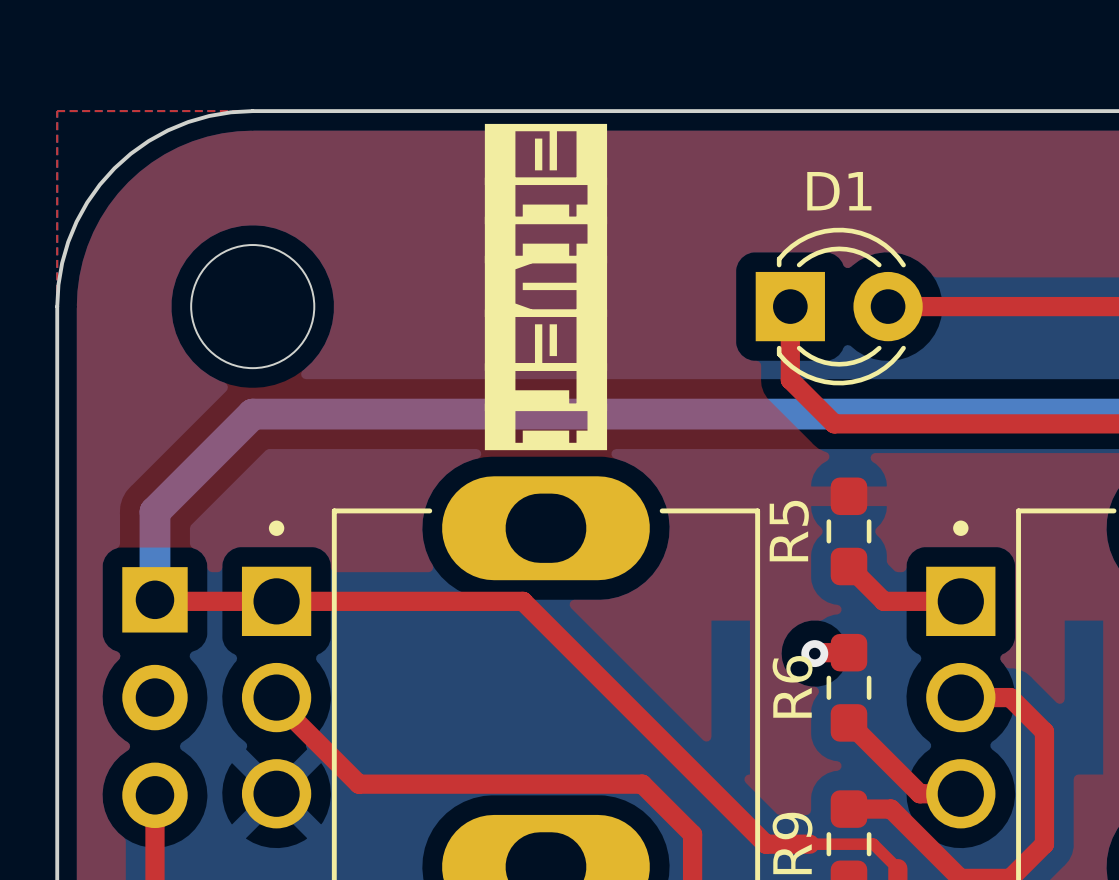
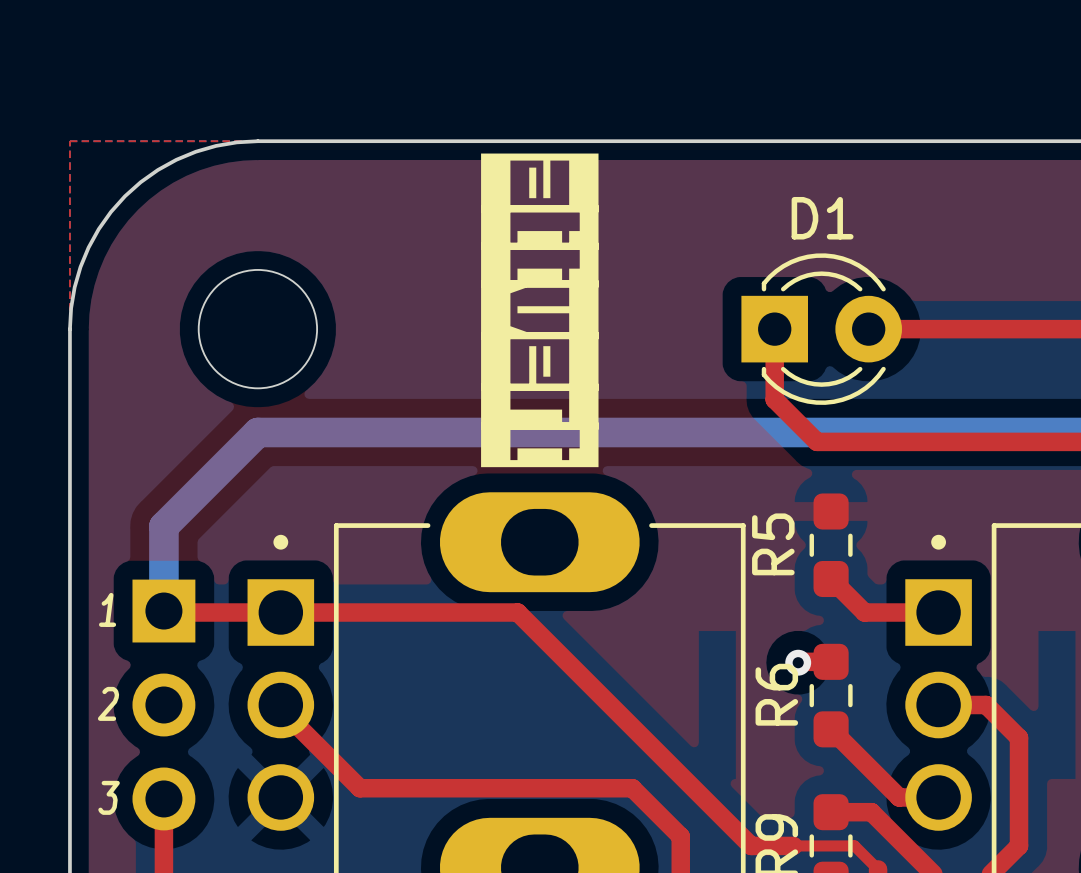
text: none -> 1 (107, 609)
text: none -> 2 (108, 703)
text: none -> 3 (109, 797)

